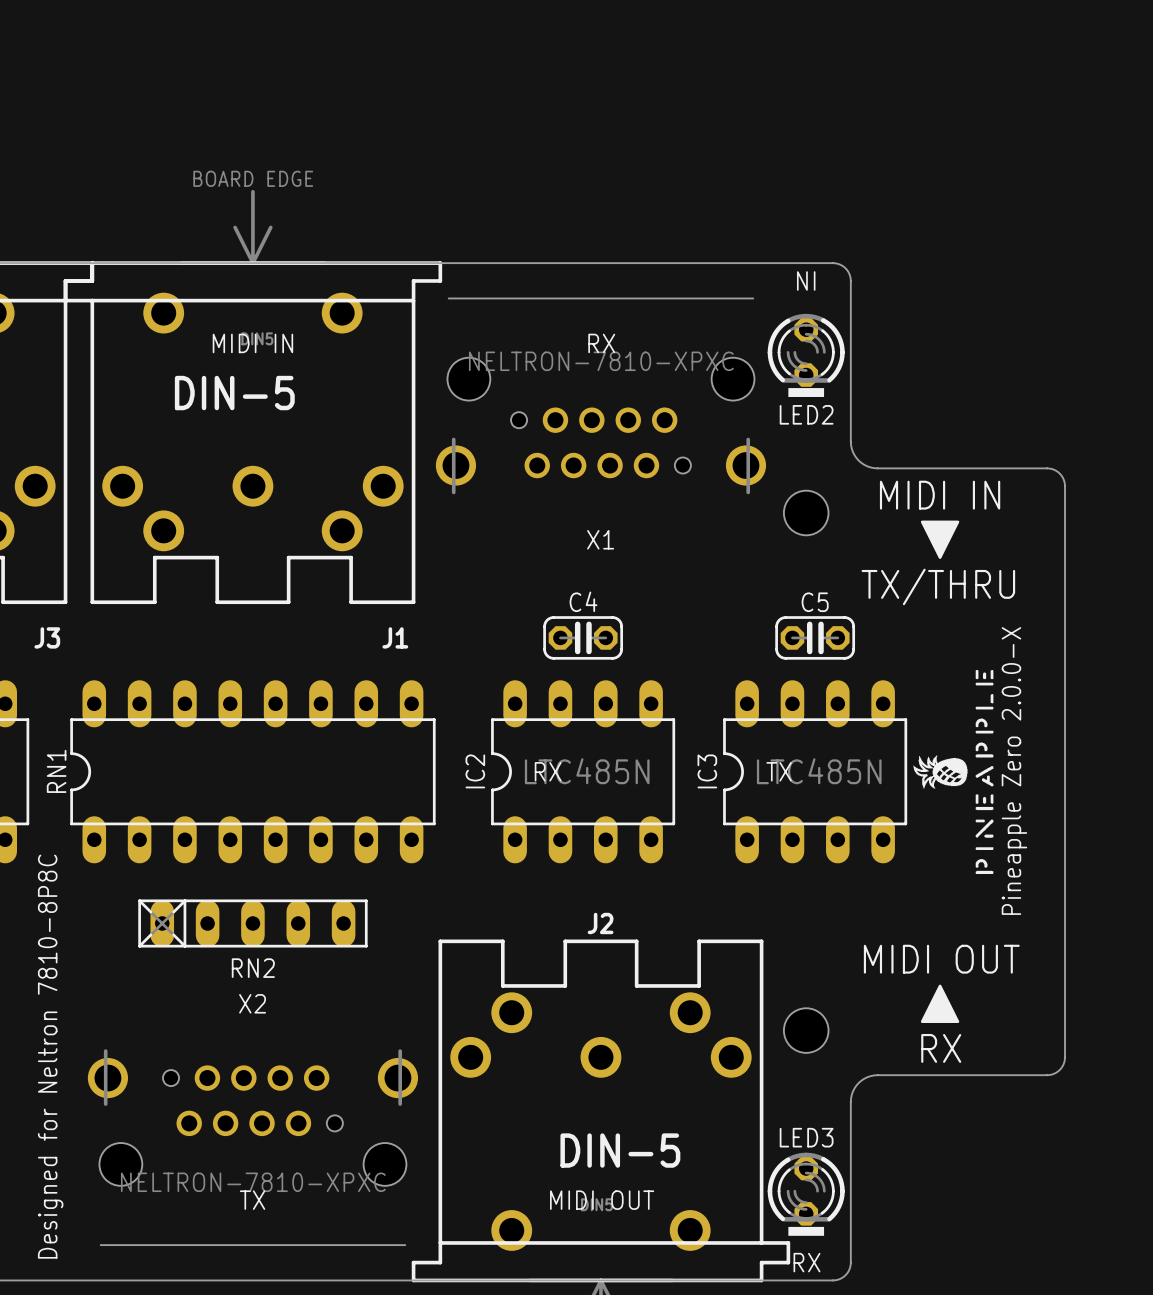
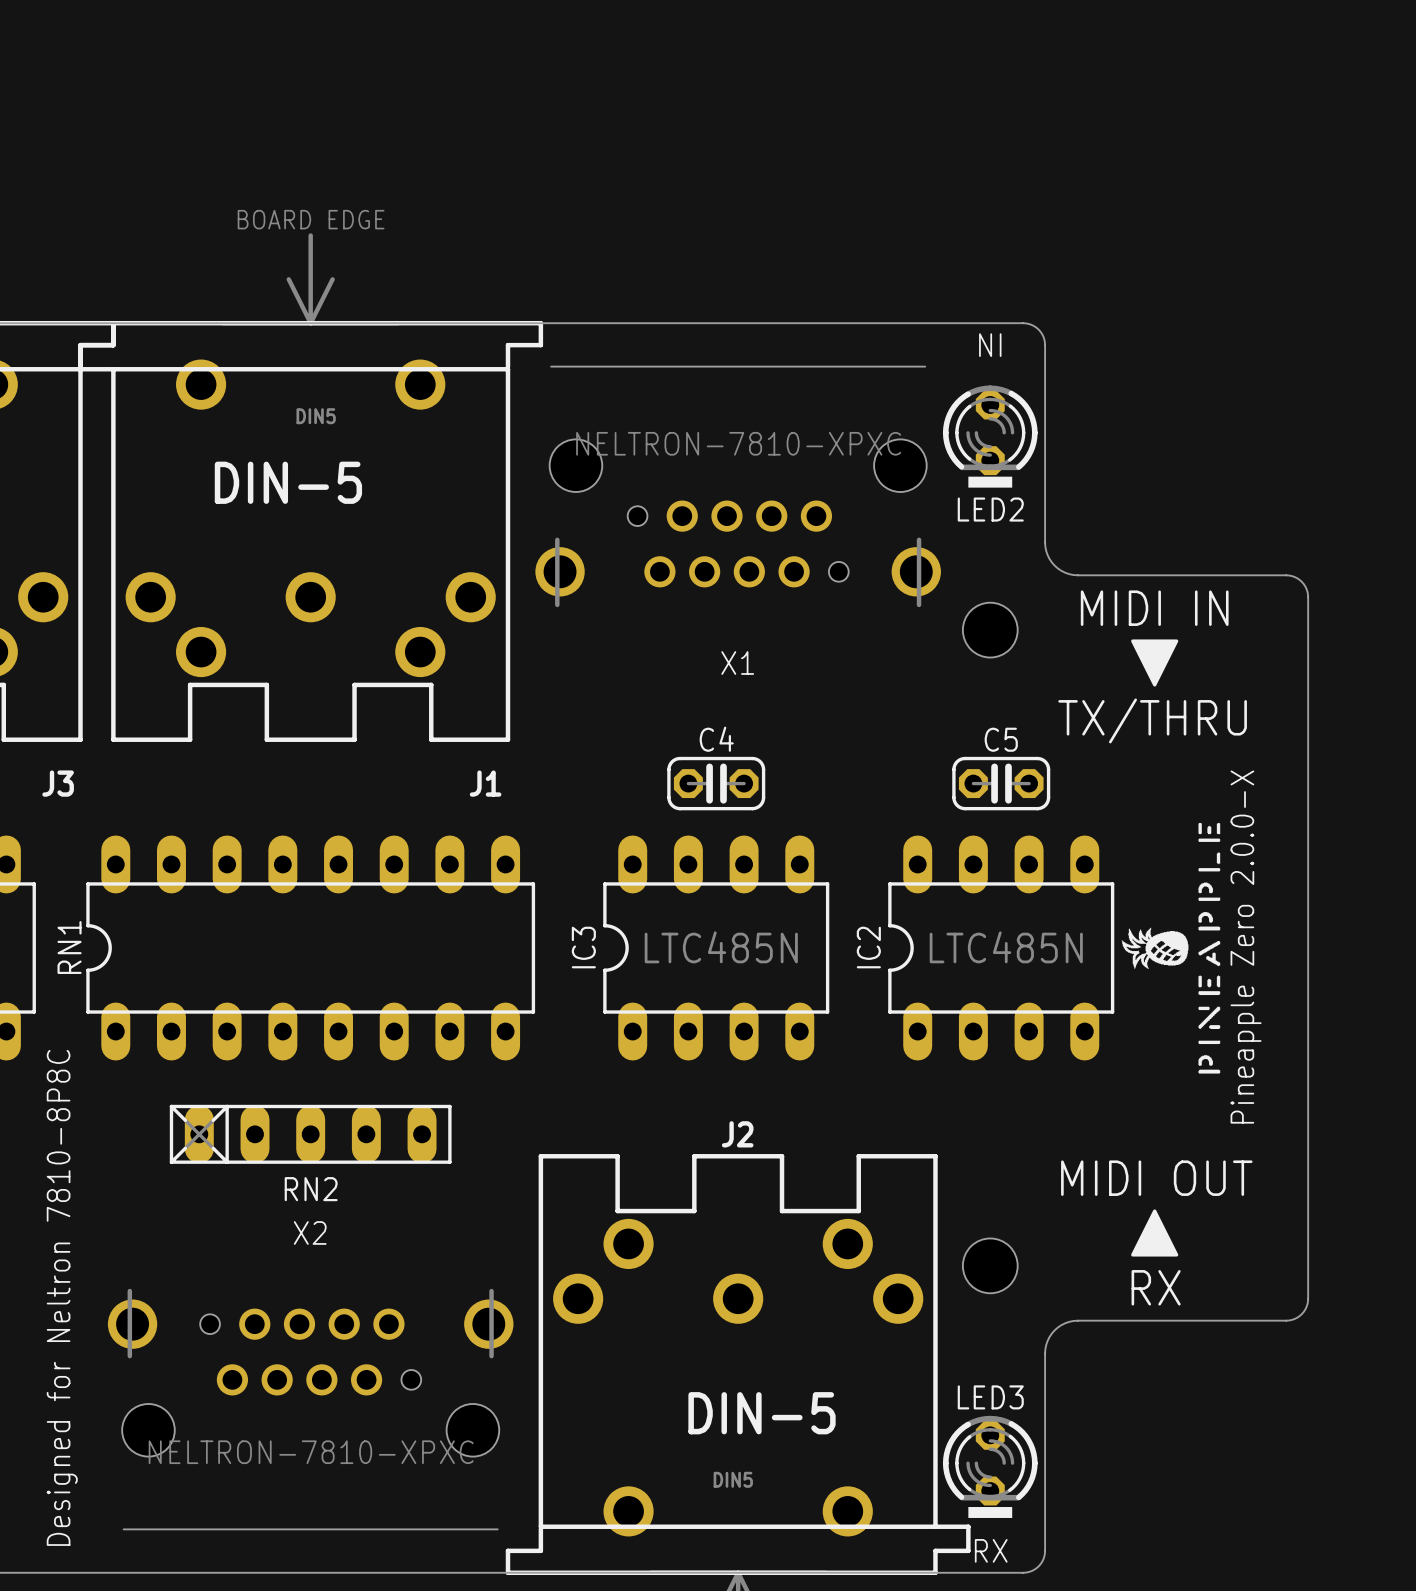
text: MIDI IN (252, 343) -> none
text: RX (601, 343) -> none
IC2 name: IC2 (475, 771) -> IC3 (583, 947)
text: RX (548, 771) -> none
IC3 name: IC3 (707, 771) -> IC2 (868, 947)
text: TX (779, 771) -> none
text: TX (252, 1200) -> none
text: MIDI OUT (602, 1200) -> none

